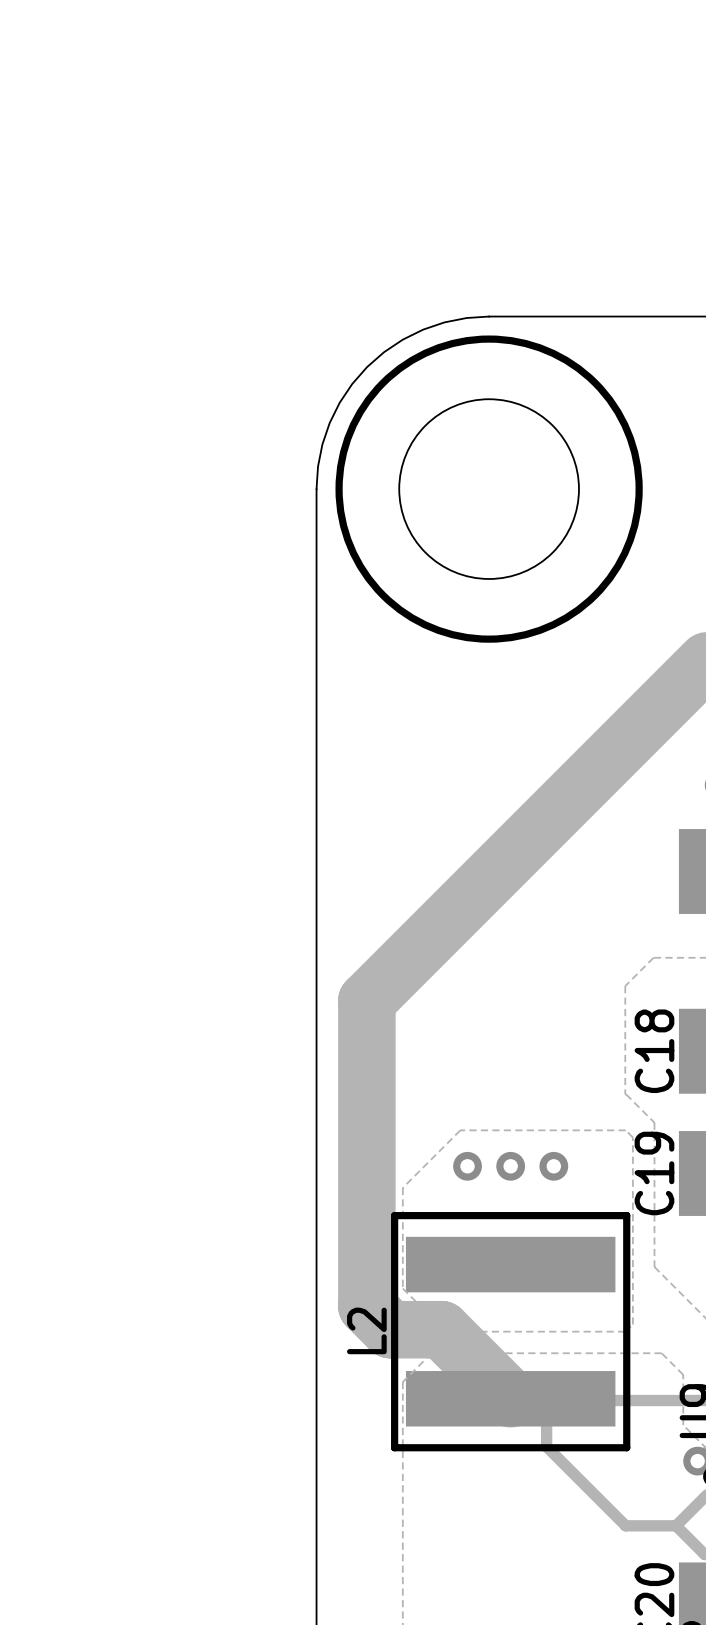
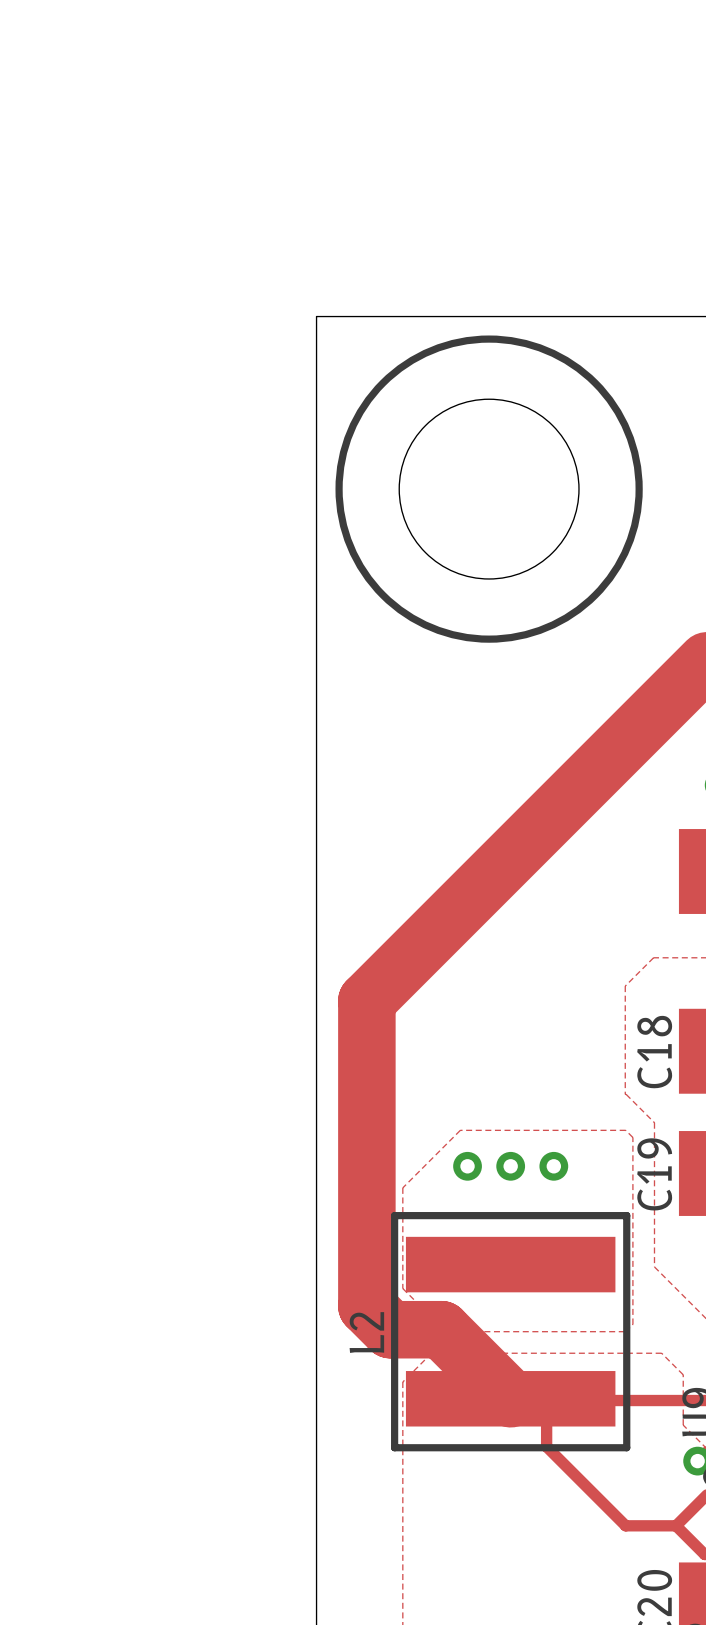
board edge: (489, 316) (466, 318) (423, 329) (402, 339) (367, 367) (339, 402) (329, 423) (318, 466) (316, 489) -> (489, 316) (316, 316) (316, 489)

